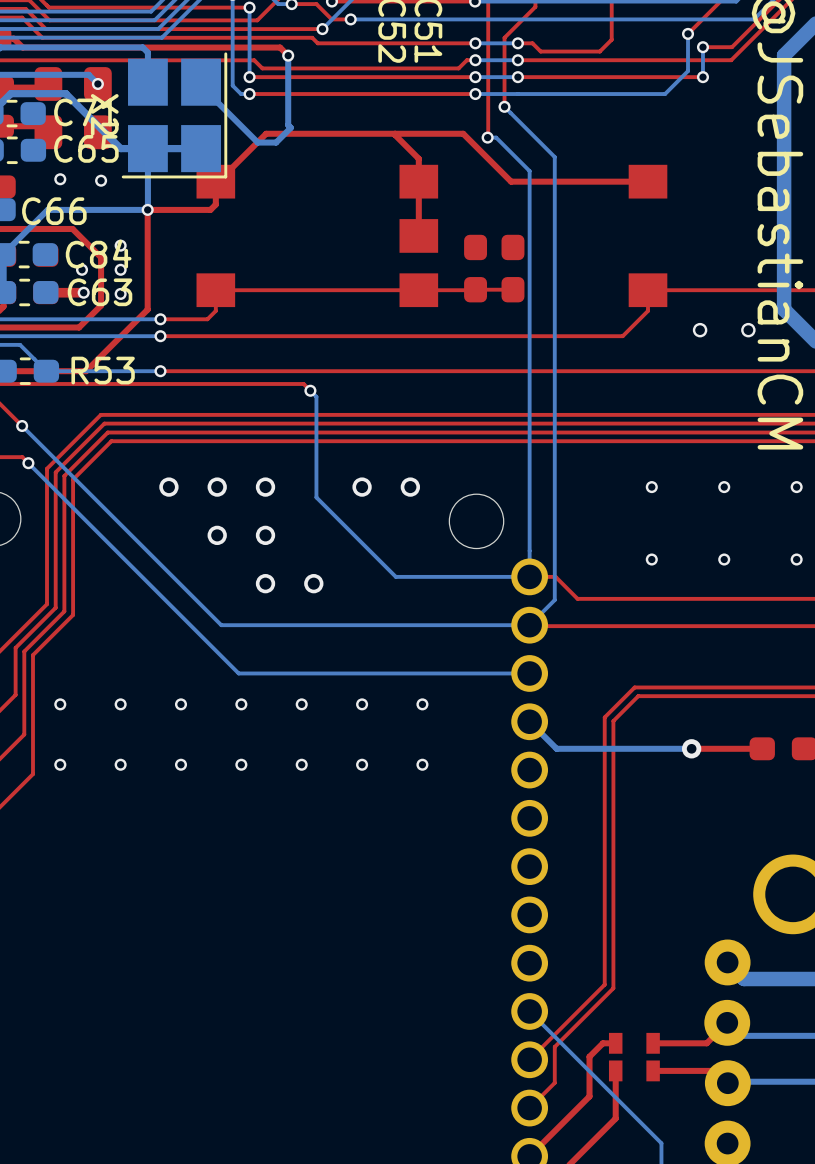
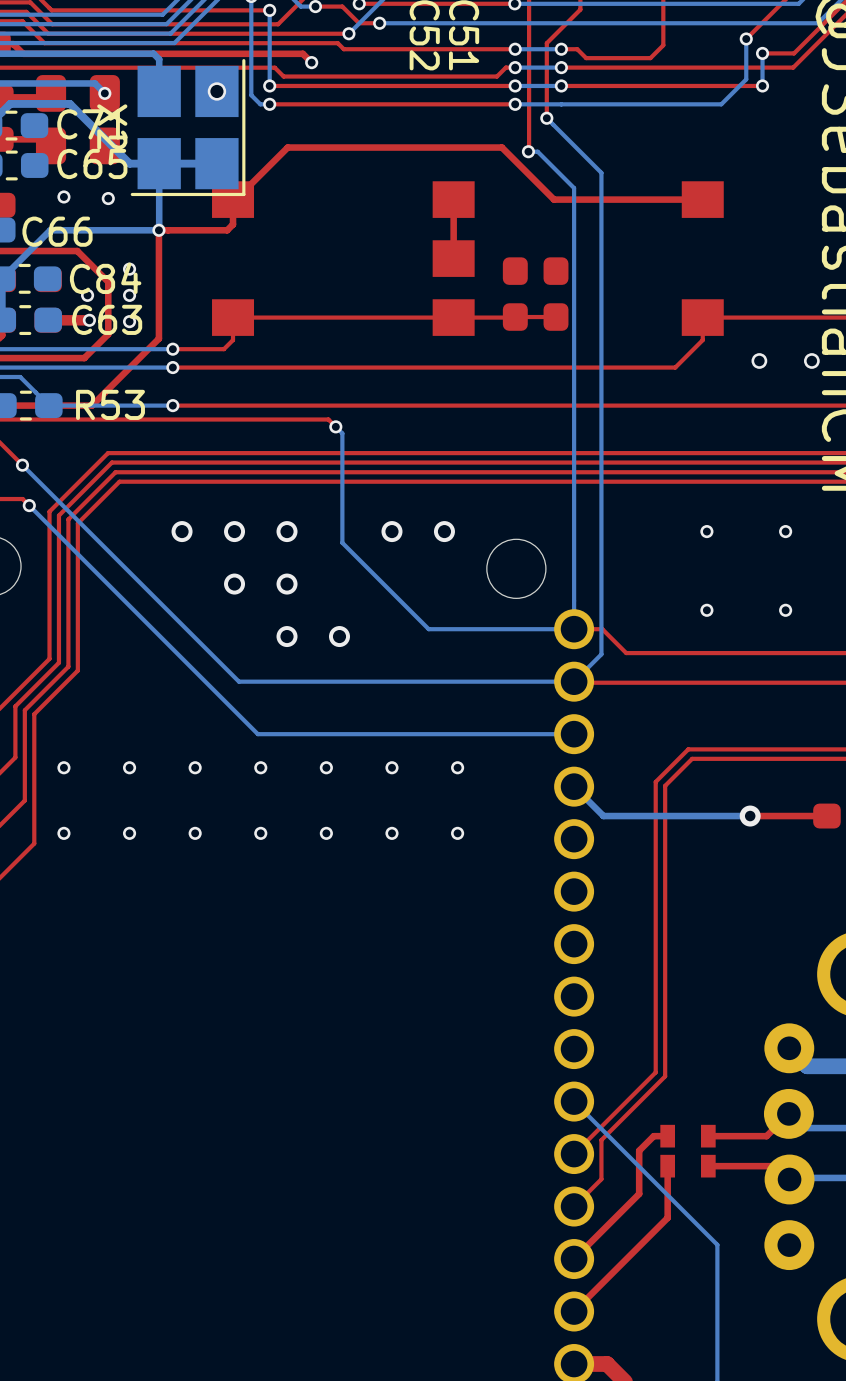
bottom track: (288, 55) (288, 125) (290, 127) (276, 142) (257, 142) (201, 85) (201, 82) -> none
via: none -> (216, 91)
top track: (395, 133) (418, 158) (418, 181) -> none

